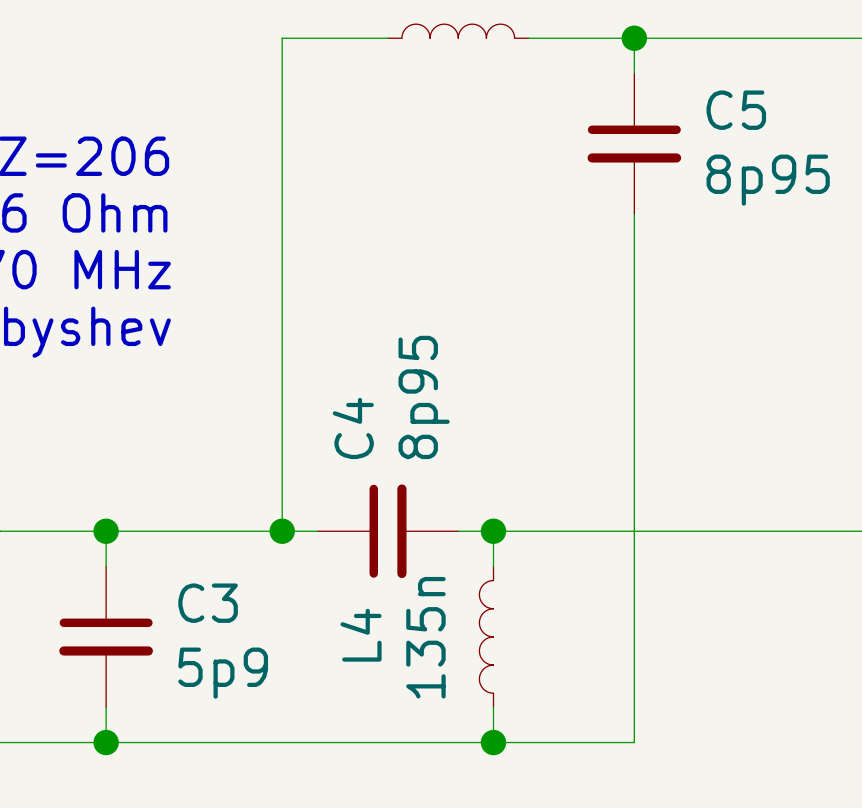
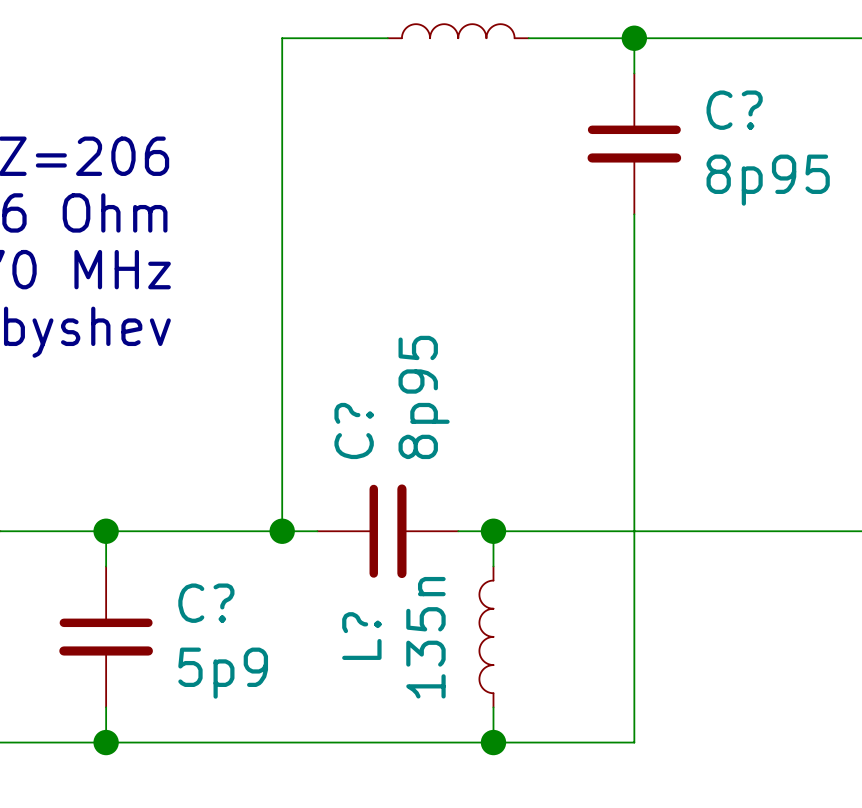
C5 name: C5 (736, 110) -> C? (734, 110)
C4 name: C4 (353, 428) -> C? (354, 430)
C3 name: C3 (208, 603) -> C? (206, 603)
L4 name: L4 (361, 635) -> L? (361, 636)

